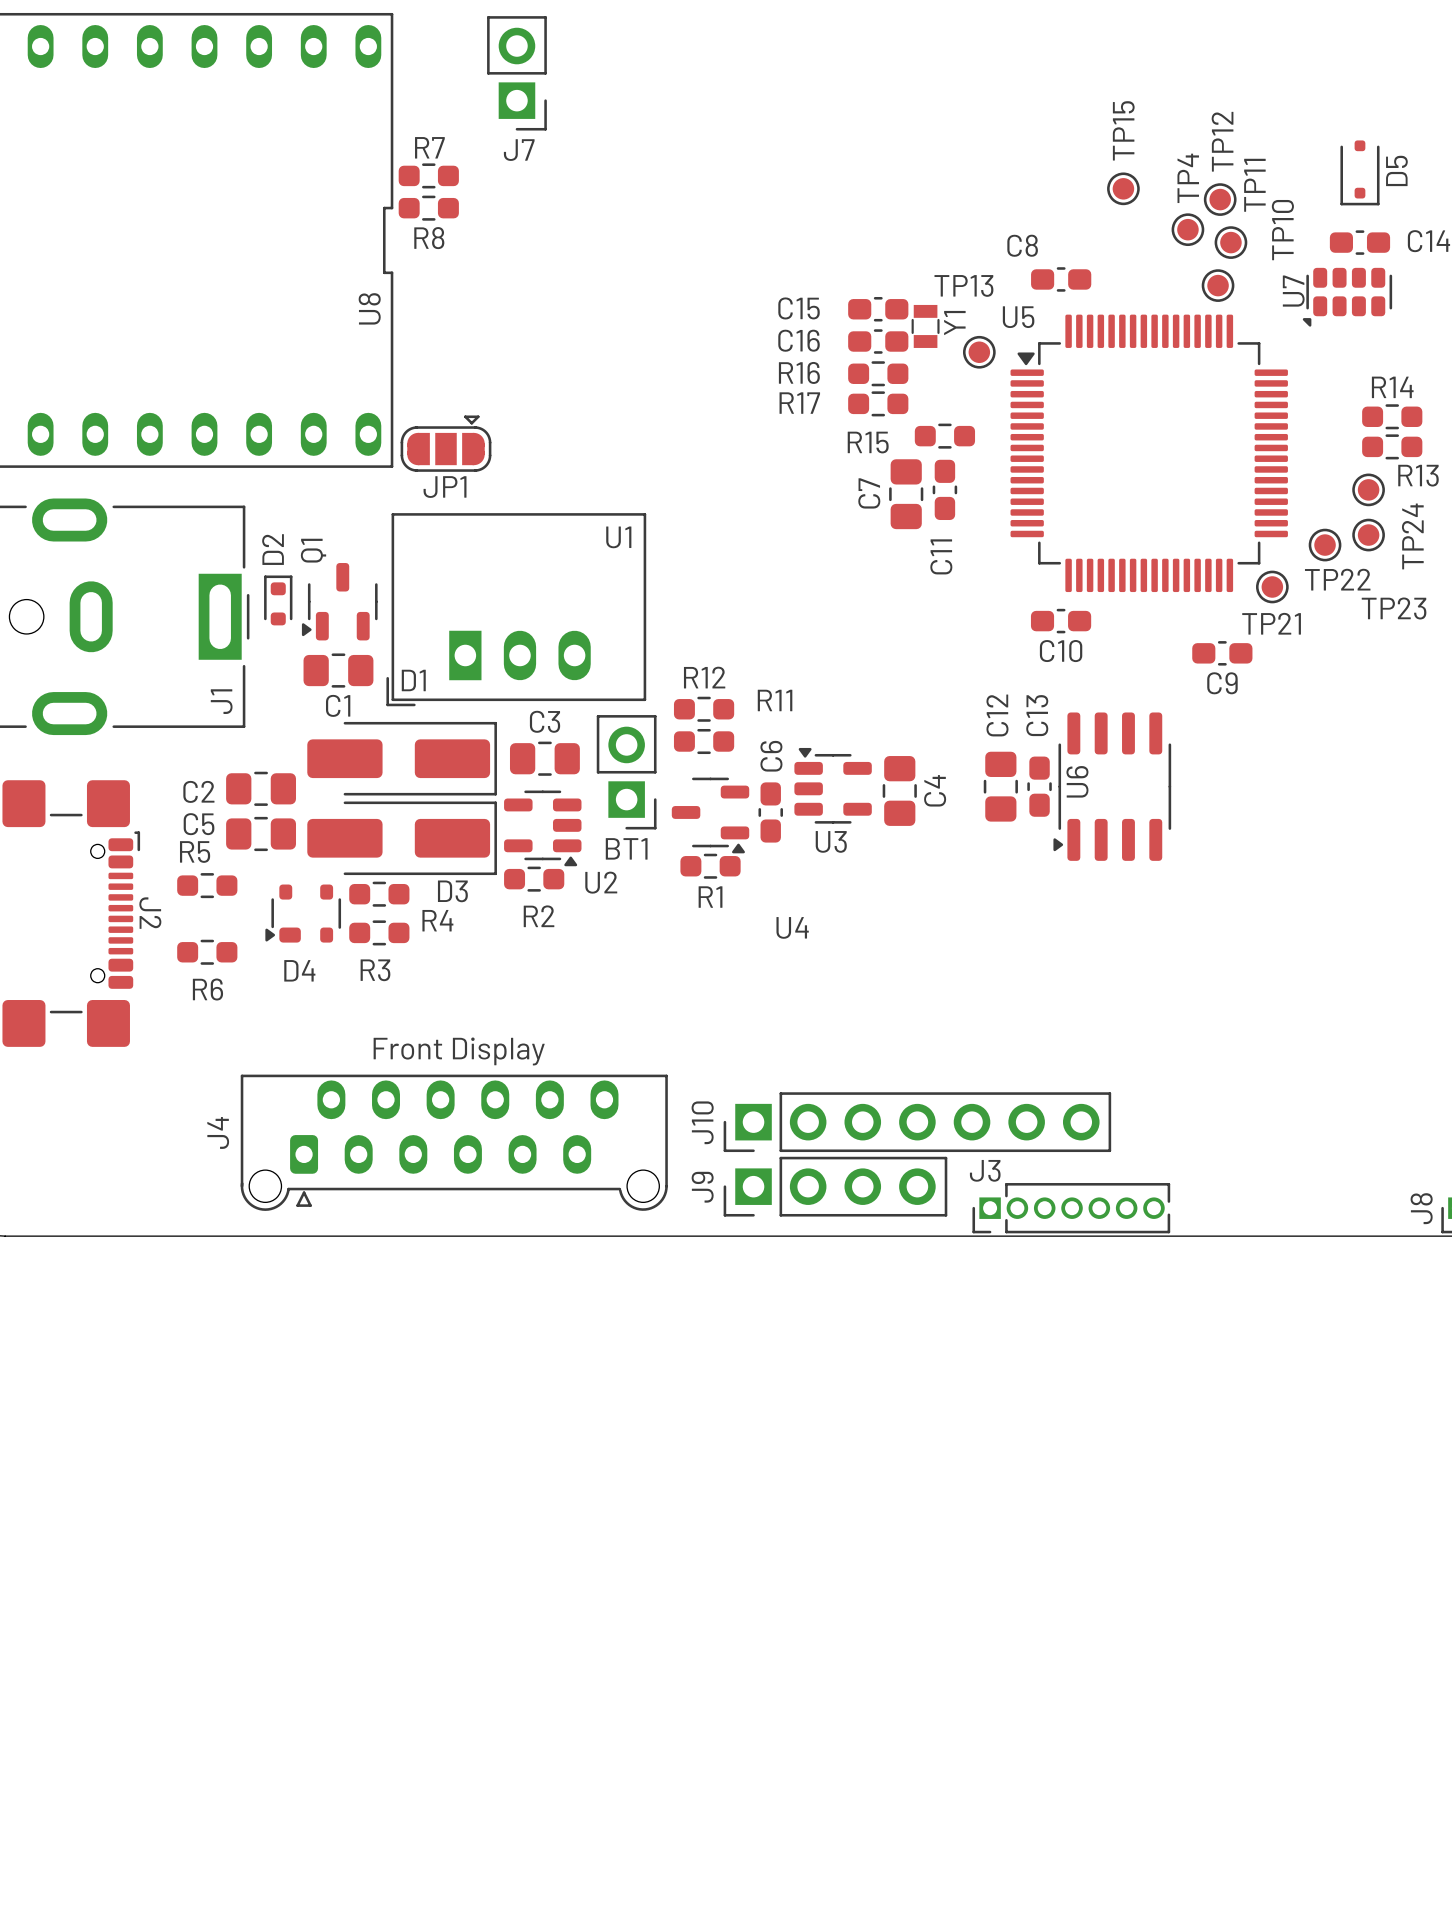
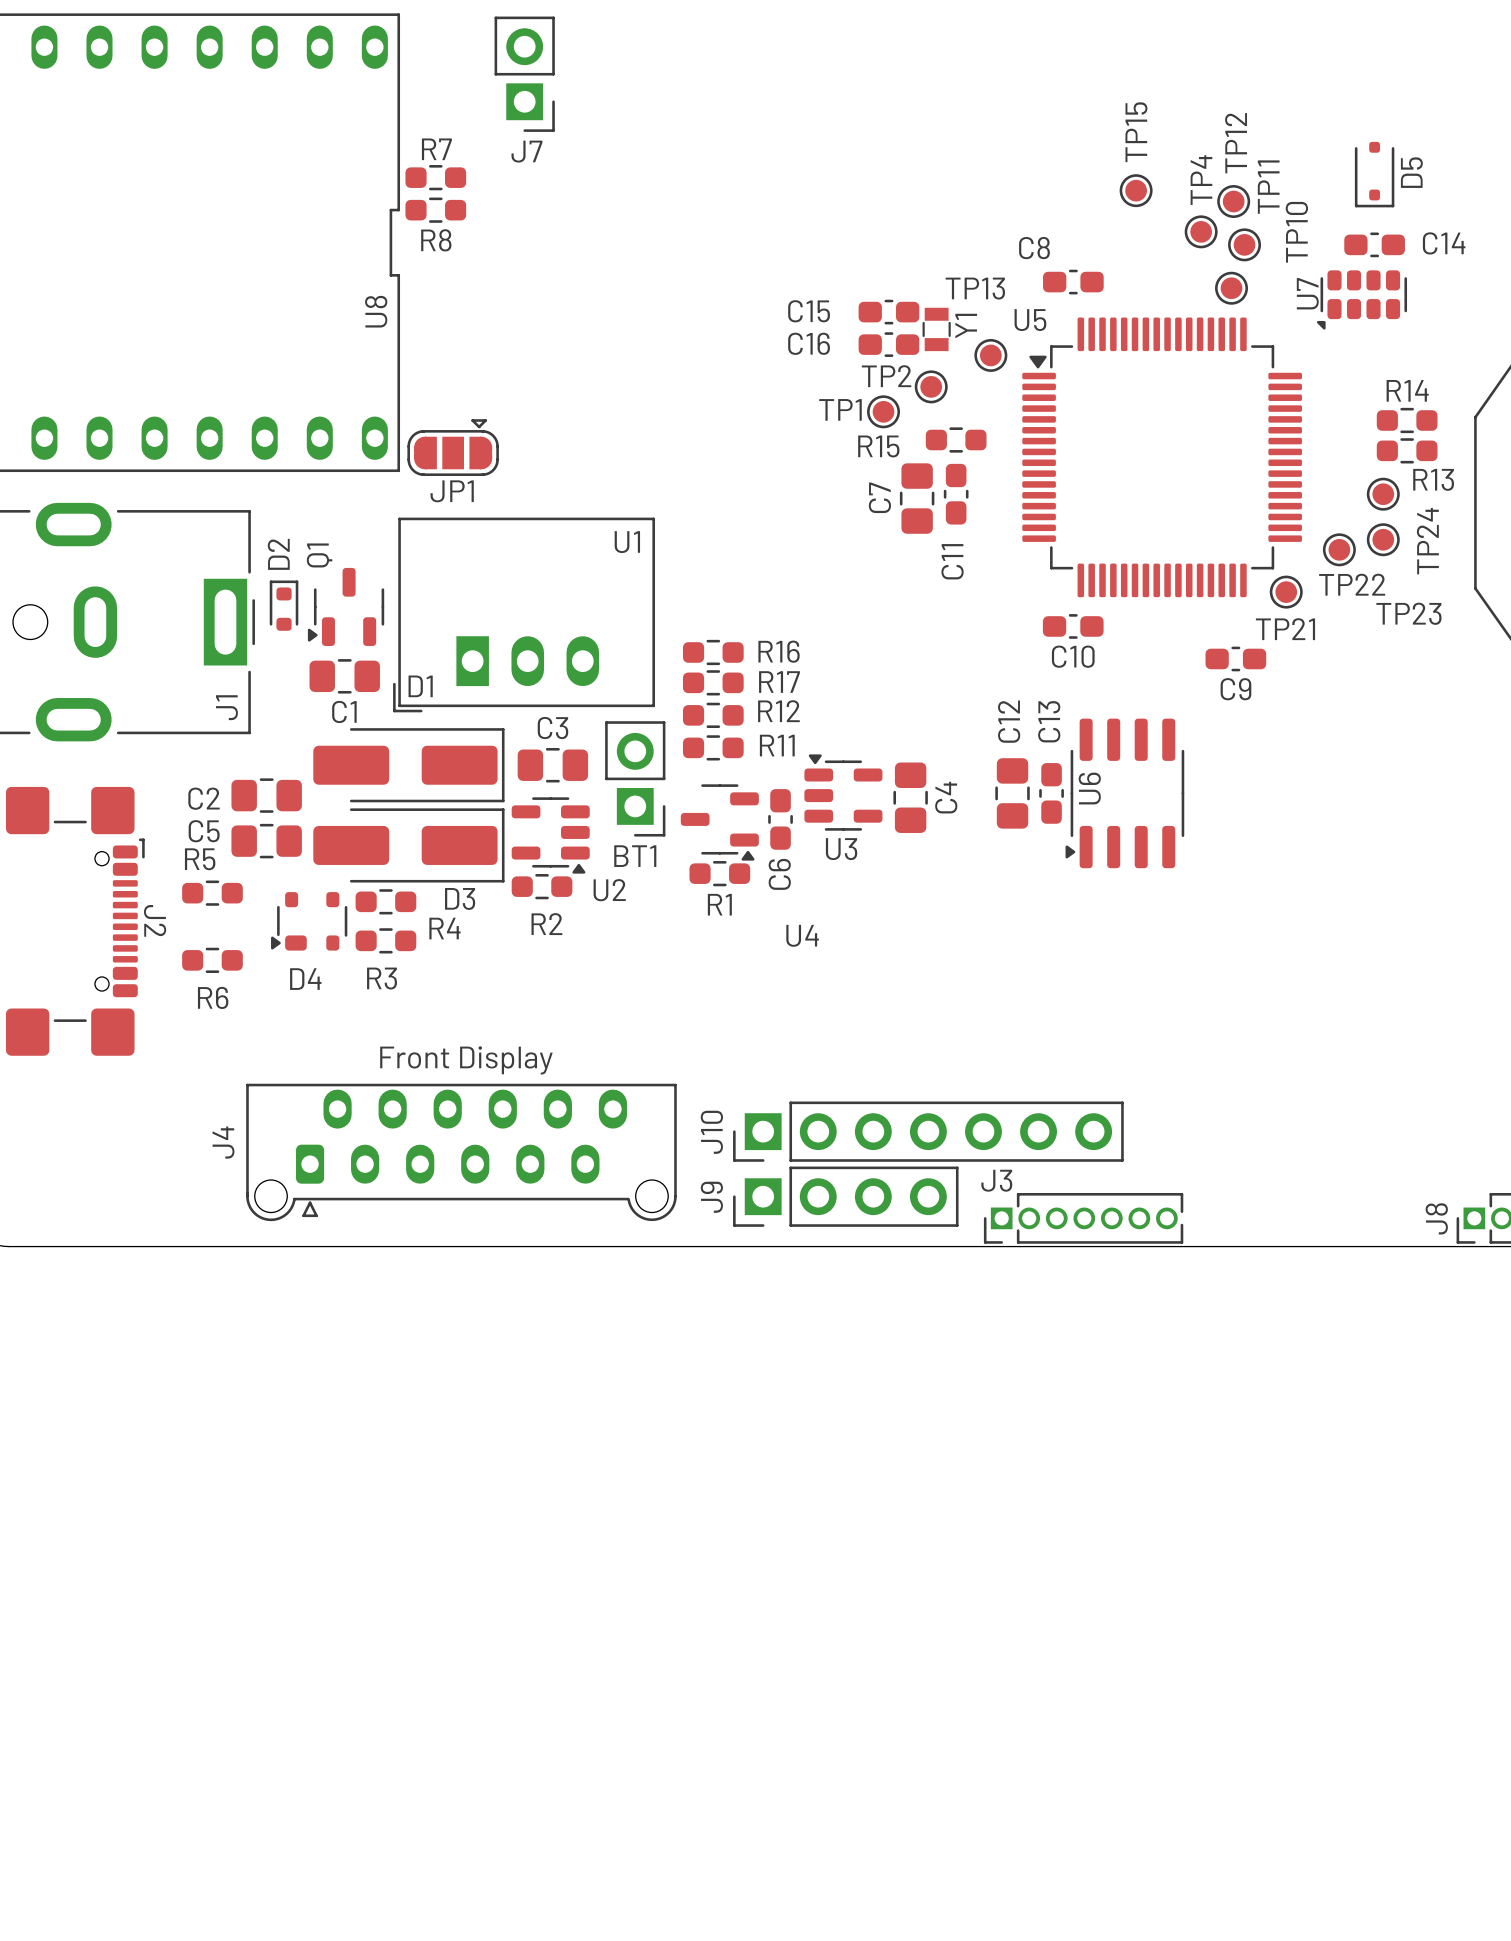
R16 name position: R16 (799, 372) -> R16 (779, 651)
R16 position: (878, 373) -> (713, 652)
TP2: none -> (931, 386)
R17 name position: R17 (799, 403) -> R17 (779, 682)
R17 position: (878, 403) -> (713, 682)
TP1: none -> (883, 411)
R12 name position: R12 (704, 677) -> R12 (778, 711)
R11 name position: R11 (775, 700) -> R11 (777, 745)
C6 name position: C6 (771, 756) -> C6 (779, 874)

